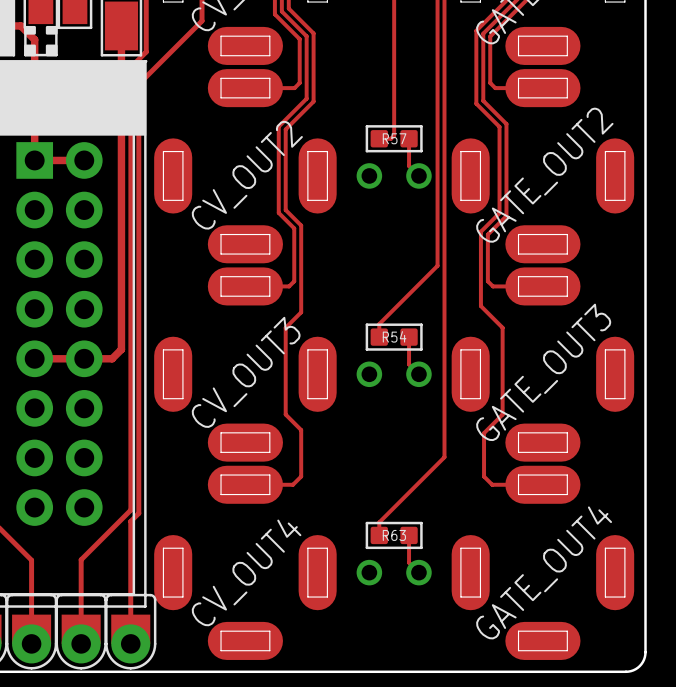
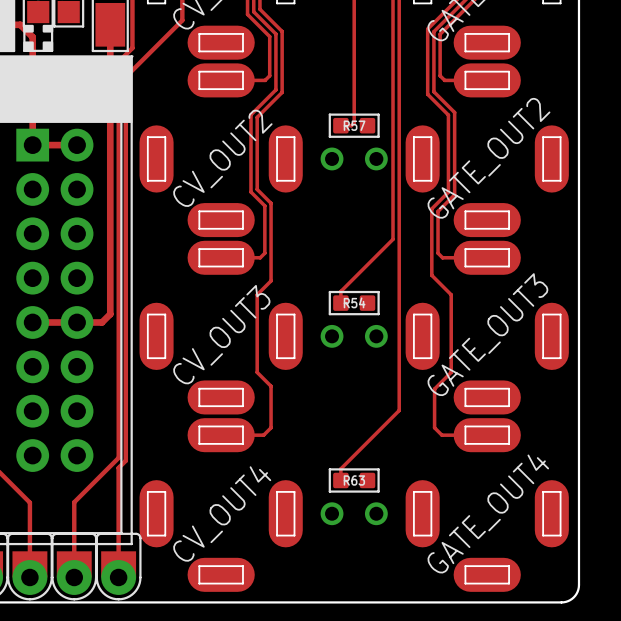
track: (409, 138) (409, 166) (418, 175) -> none
track: (409, 337) (409, 364) (418, 374) -> none
track: (409, 535) (409, 562) (418, 572) -> none

